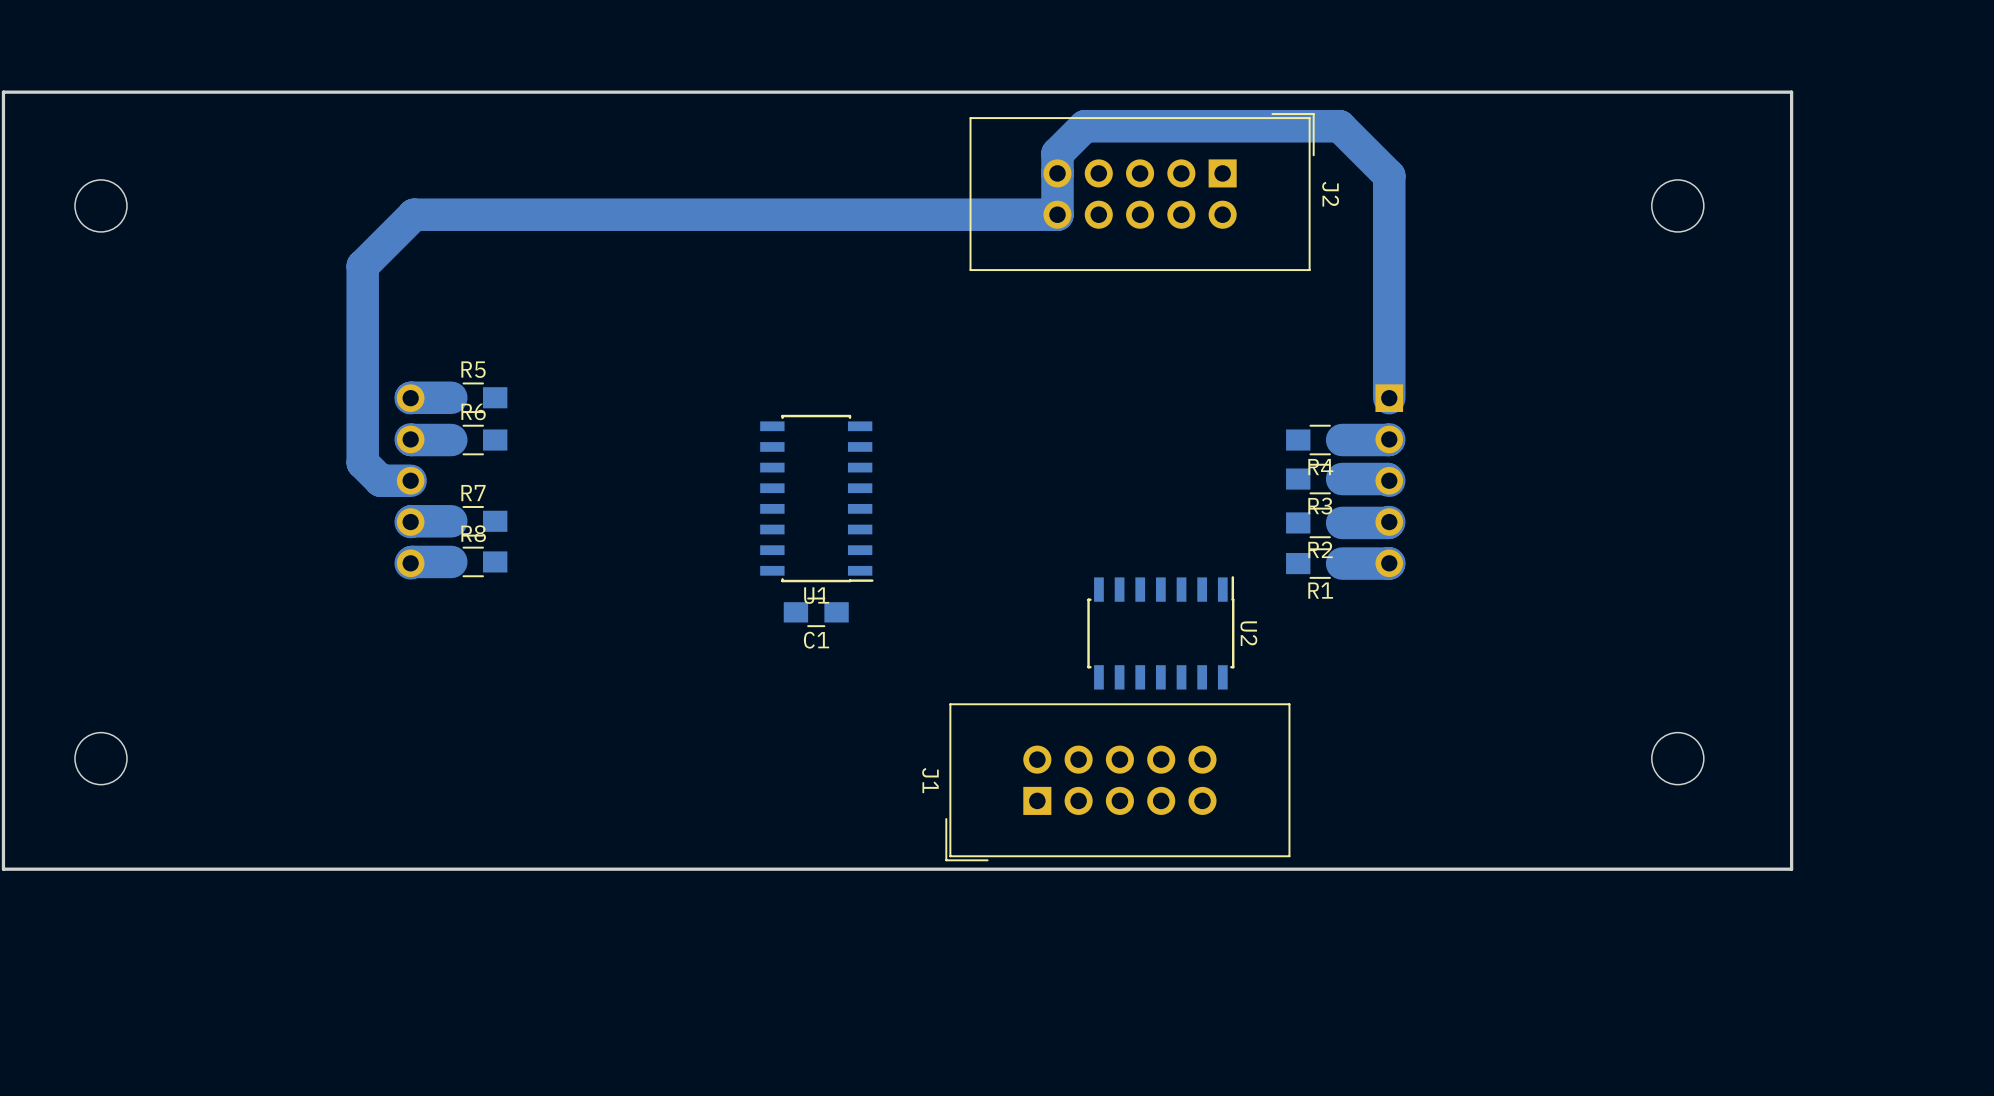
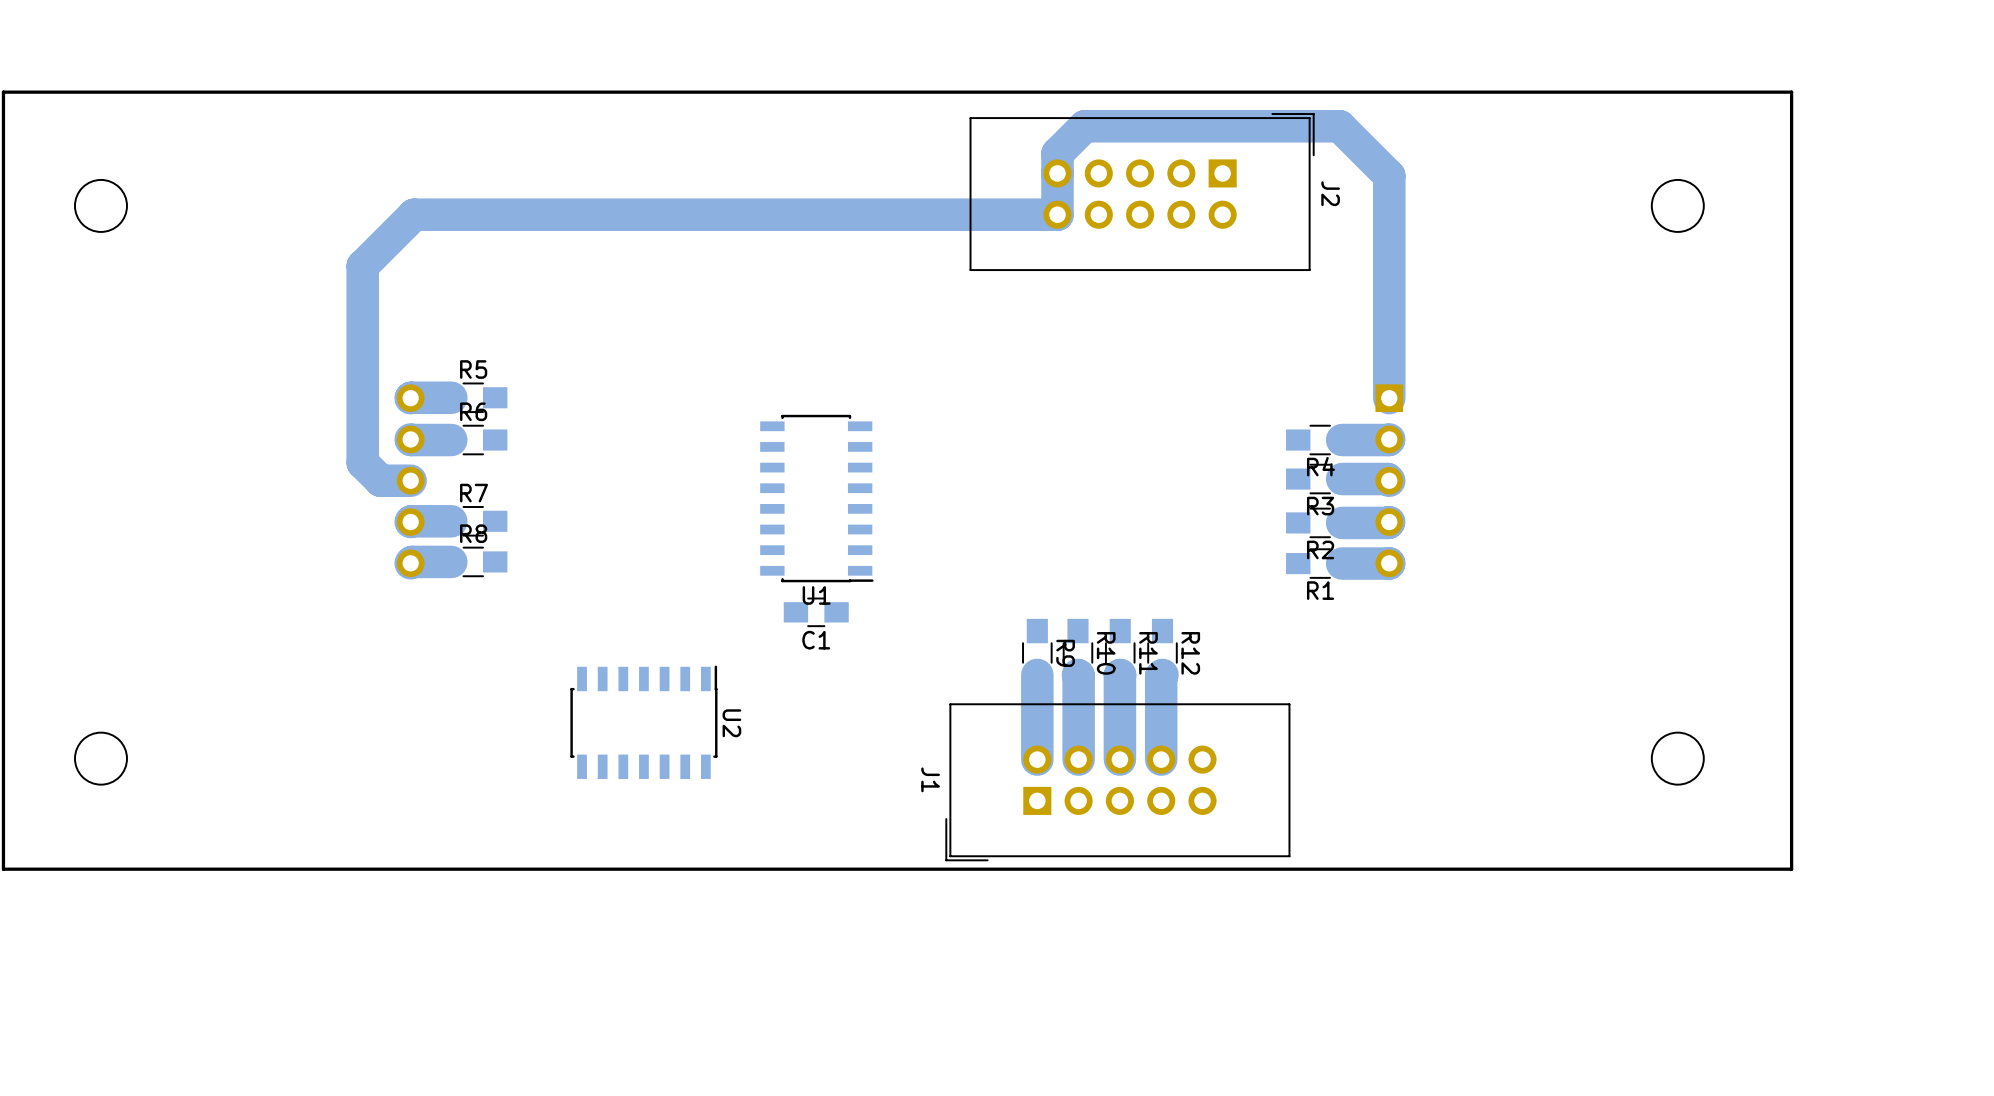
U2 position: (1160, 632) -> (643, 722)
R9: none -> (1037, 652)
R10: none -> (1077, 652)
R11: none -> (1120, 652)
R12: none -> (1162, 652)
track: none -> (1037, 674) (1037, 759)
track: none -> (1077, 674) (1078, 759)
track: none -> (1120, 674) (1119, 759)
track: none -> (1162, 674) (1161, 759)

